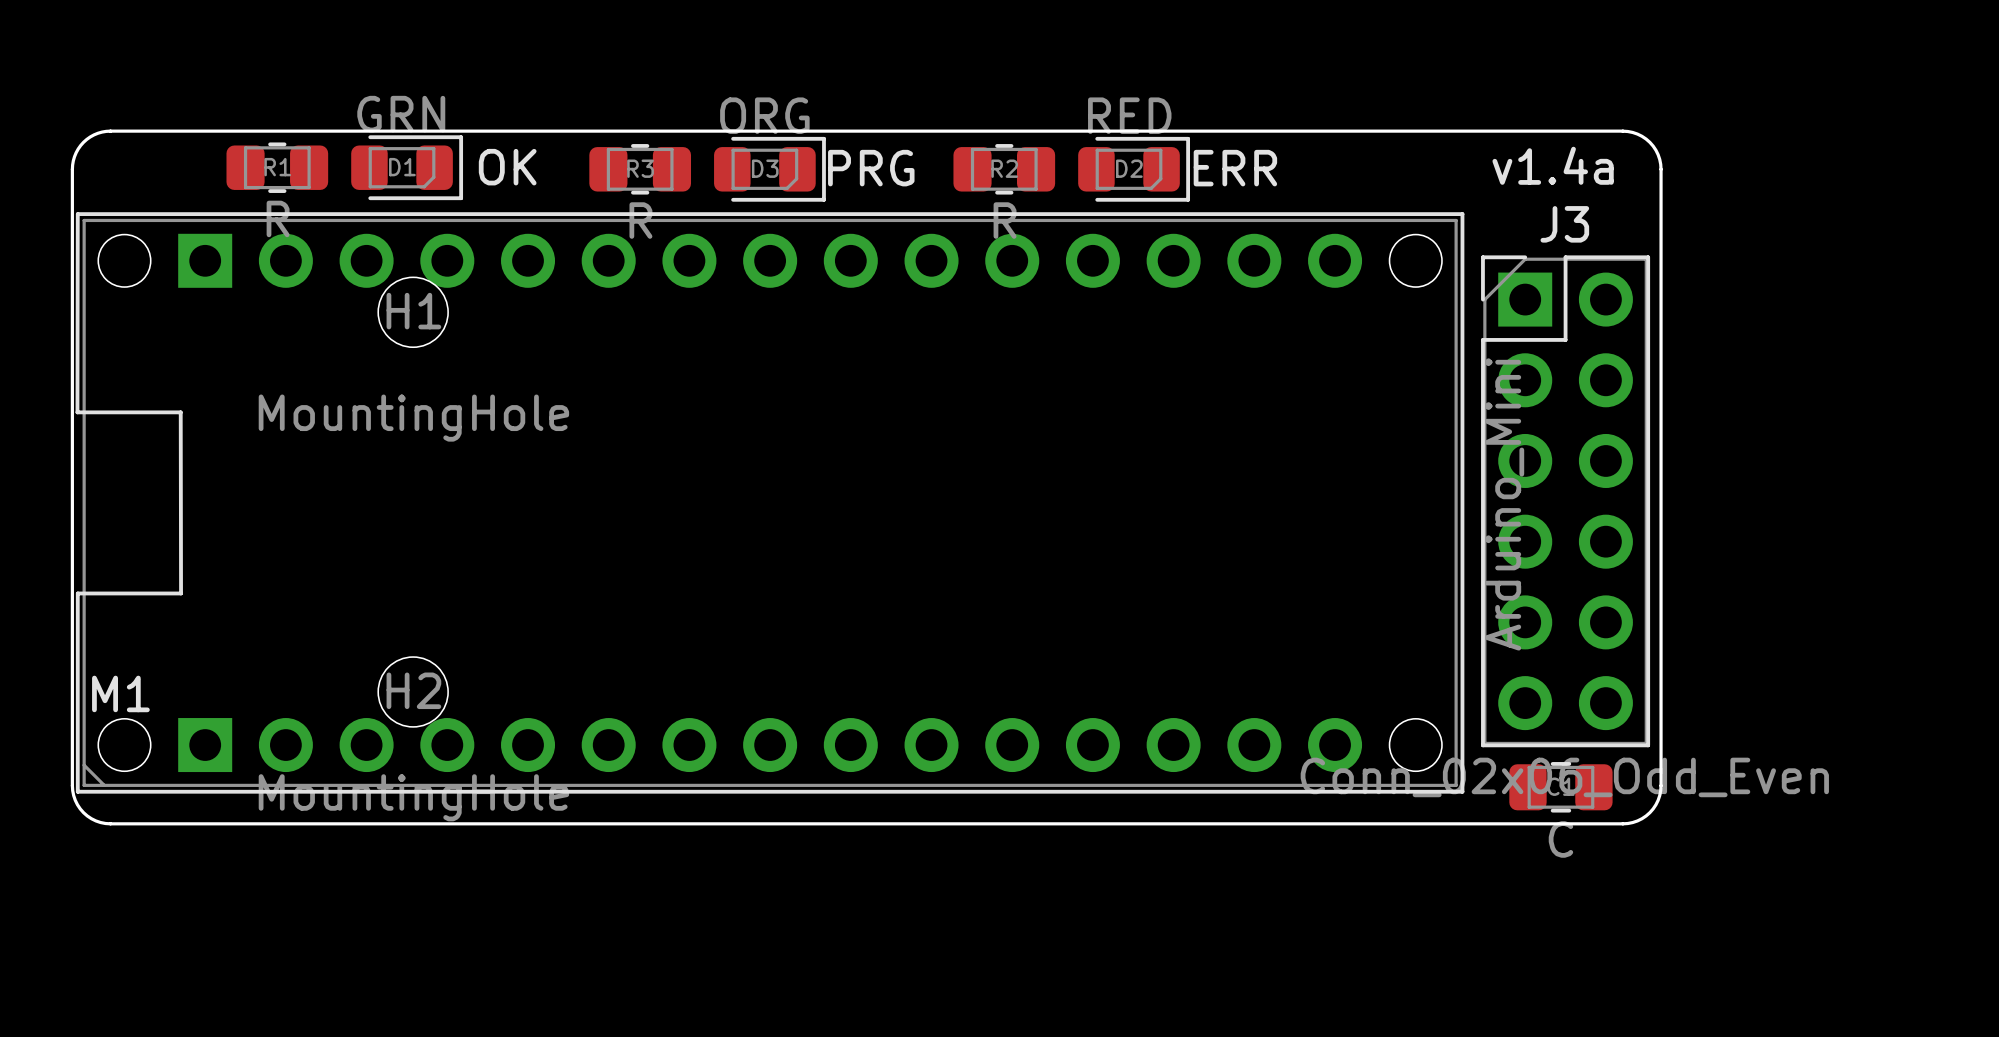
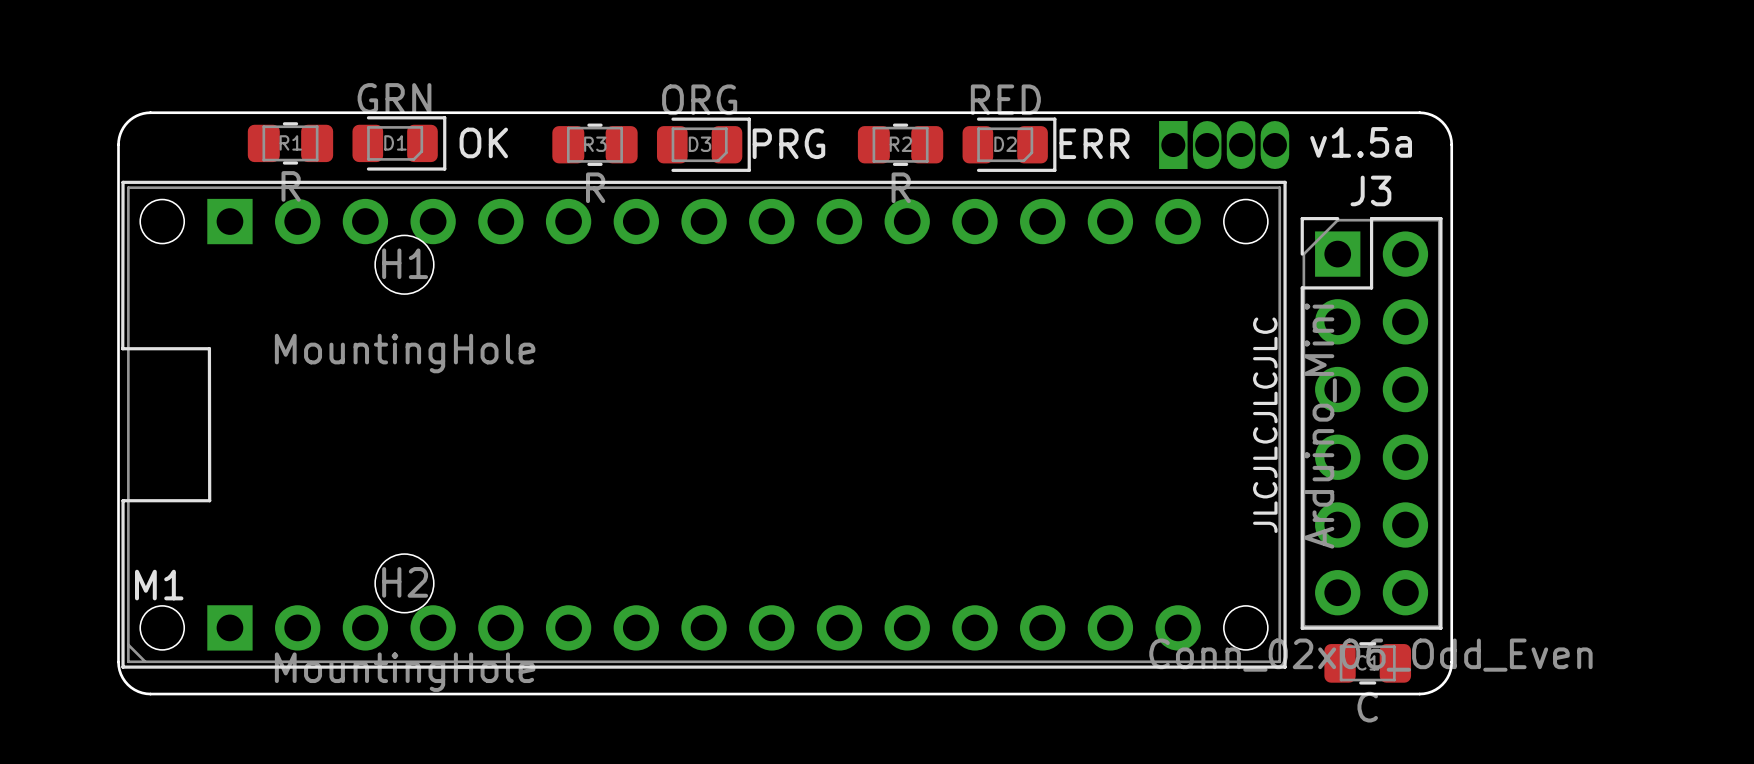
text: v1.4a (1553, 165) -> v1.5a (1361, 142)
part: none -> (1224, 145)
text: none -> JLCJLCJLCJLC (1265, 425)

